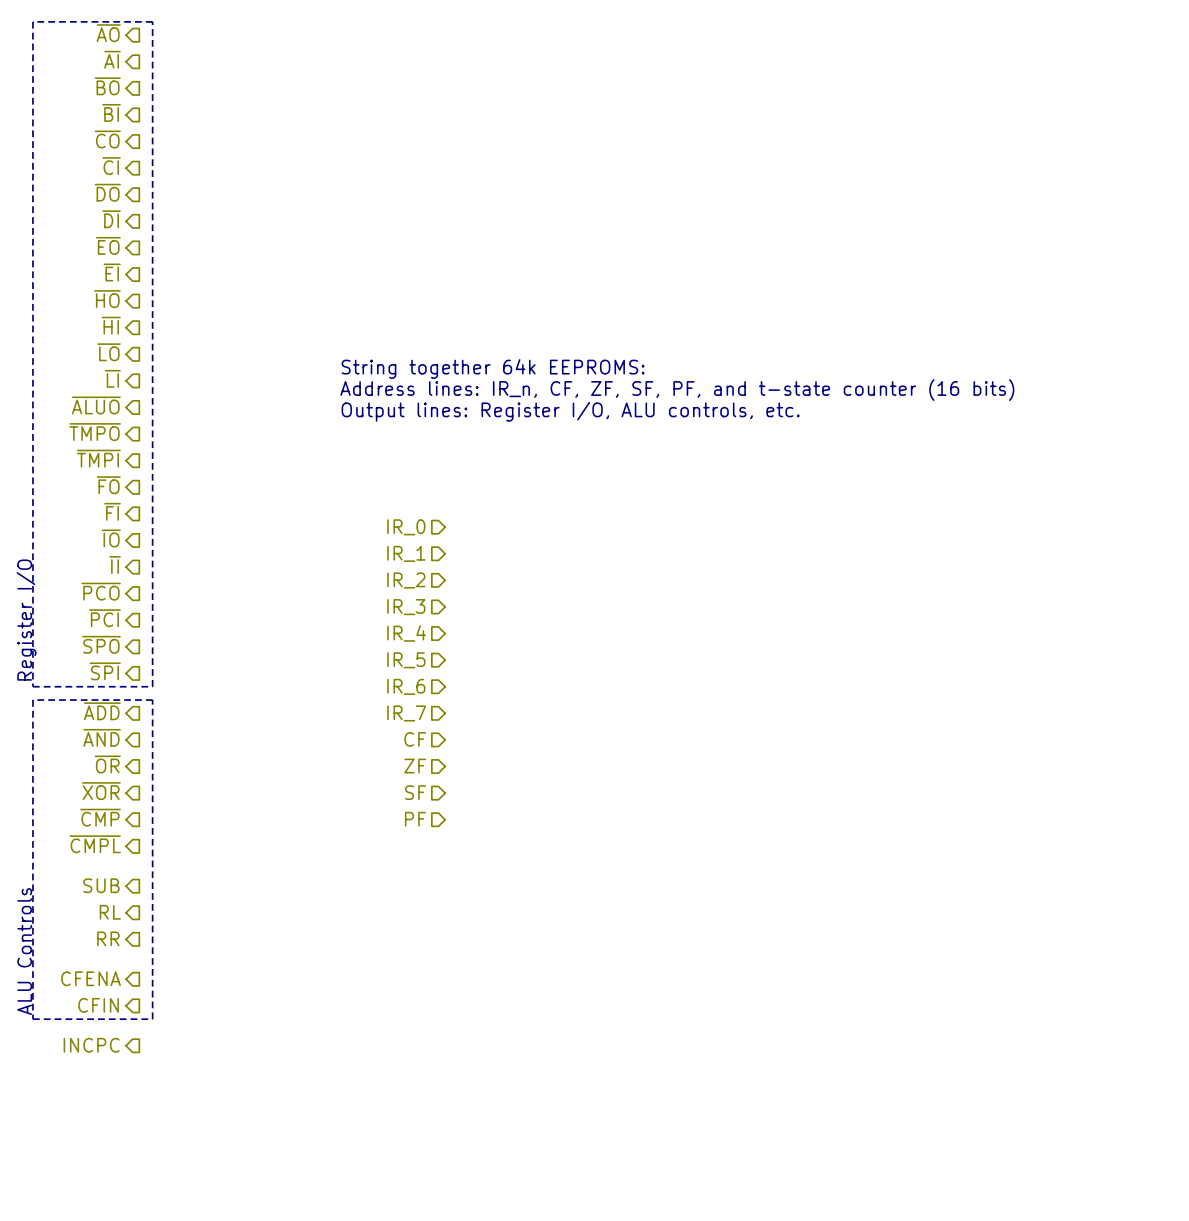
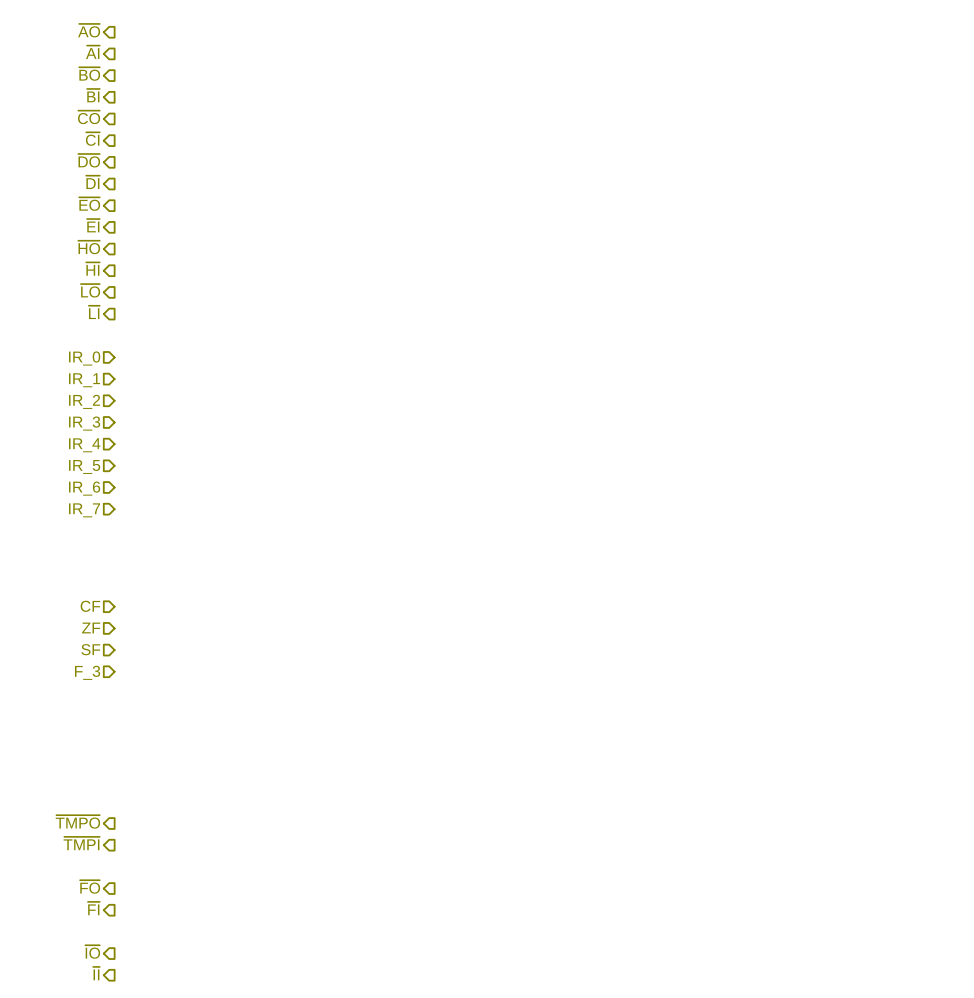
line: (32, 21) (152, 21) (152, 686) (32, 686) (32, 21) -> none
text: String together 64k EEPROMS: (493, 368) -> none
text: Address lines: IR_n, CF, ZF, SF, PF, and t-state counter (16 bits) (677, 390) -> none
hierarchical label: ~{ALUO} (96, 405) -> none
text: Output lines: Register I/O, ALU controls, etc. (570, 411) -> none
hierarchical label shape: output (95, 432) -> input (84, 358)
hierarchical label: ~{TMPO} (95, 432) -> IR_0 (84, 358)
hierarchical label shape: output (98, 458) -> input (84, 380)
hierarchical label: ~{TMPI} (98, 458) -> IR_1 (84, 380)
hierarchical label shape: output (108, 485) -> input (84, 401)
hierarchical label: ~{FO} (108, 485) -> IR_2 (84, 401)
hierarchical label shape: output (112, 511) -> input (84, 423)
hierarchical label: ~{FI} (112, 511) -> IR_3 (84, 423)
hierarchical label: IR_0 (406, 527) -> none
hierarchical label shape: output (111, 538) -> input (84, 445)
hierarchical label: ~{IO} (111, 538) -> IR_4 (84, 445)
hierarchical label: IR_1 (406, 553) -> none
hierarchical label shape: output (115, 565) -> input (84, 466)
hierarchical label: ~{II} (115, 565) -> IR_5 (84, 466)
hierarchical label: IR_2 (406, 580) -> none
hierarchical label shape: output (101, 591) -> input (84, 488)
hierarchical label: ~{PCO} (101, 591) -> IR_6 (84, 488)
hierarchical label: IR_3 (406, 607) -> none
hierarchical label shape: output (104, 618) -> input (84, 510)
hierarchical label: ~{PCI} (104, 618) -> IR_7 (84, 510)
text: Register I/O (26, 620) -> none
hierarchical label: IR_4 (406, 633) -> none
hierarchical label: ~{SPO} (101, 644) -> none
hierarchical label: IR_5 (406, 660) -> none
hierarchical label: ~{SPI} (105, 671) -> none
hierarchical label: IR_6 (406, 686) -> none
line: (32, 700) (32, 1019) (152, 1019) (152, 700) (32, 700) -> none
hierarchical label: ~{ADD} (102, 711) -> none
hierarchical label: IR_7 (406, 713) -> none
hierarchical label shape: output (102, 737) -> input (90, 606)
hierarchical label: ~{AND} (102, 737) -> CF (90, 606)
hierarchical label: CF (415, 739) -> none
hierarchical label shape: output (107, 764) -> input (91, 628)
hierarchical label: ~{OR} (107, 764) -> ZF (91, 628)
hierarchical label: ZF (415, 766) -> none
hierarchical label shape: output (101, 791) -> input (90, 649)
hierarchical label: ~{XOR} (101, 791) -> SF (90, 649)
hierarchical label: SF (415, 792) -> none
hierarchical label shape: output (100, 817) -> input (87, 672)
hierarchical label: ~{CMP} (100, 817) -> F_3 (87, 672)
hierarchical label: PF (415, 819) -> none
hierarchical label: ~{CMPL} (95, 844) -> none
hierarchical label: SUB (101, 885) -> none
hierarchical label: RL (110, 912) -> none
hierarchical label: RR (108, 938) -> none
text: ALU Controls (24, 951) -> none
hierarchical label: CFENA (91, 978) -> none
hierarchical label: CFIN (98, 1005) -> ~{TMPO} (77, 821)
hierarchical label: none -> ~{TMPI} (81, 843)
hierarchical label: INCPC (91, 1045) -> none
hierarchical label: none -> ~{FO} (90, 886)
hierarchical label: none -> ~{FI} (93, 908)
hierarchical label: none -> ~{IO} (92, 952)
hierarchical label: none -> ~{II} (96, 973)

